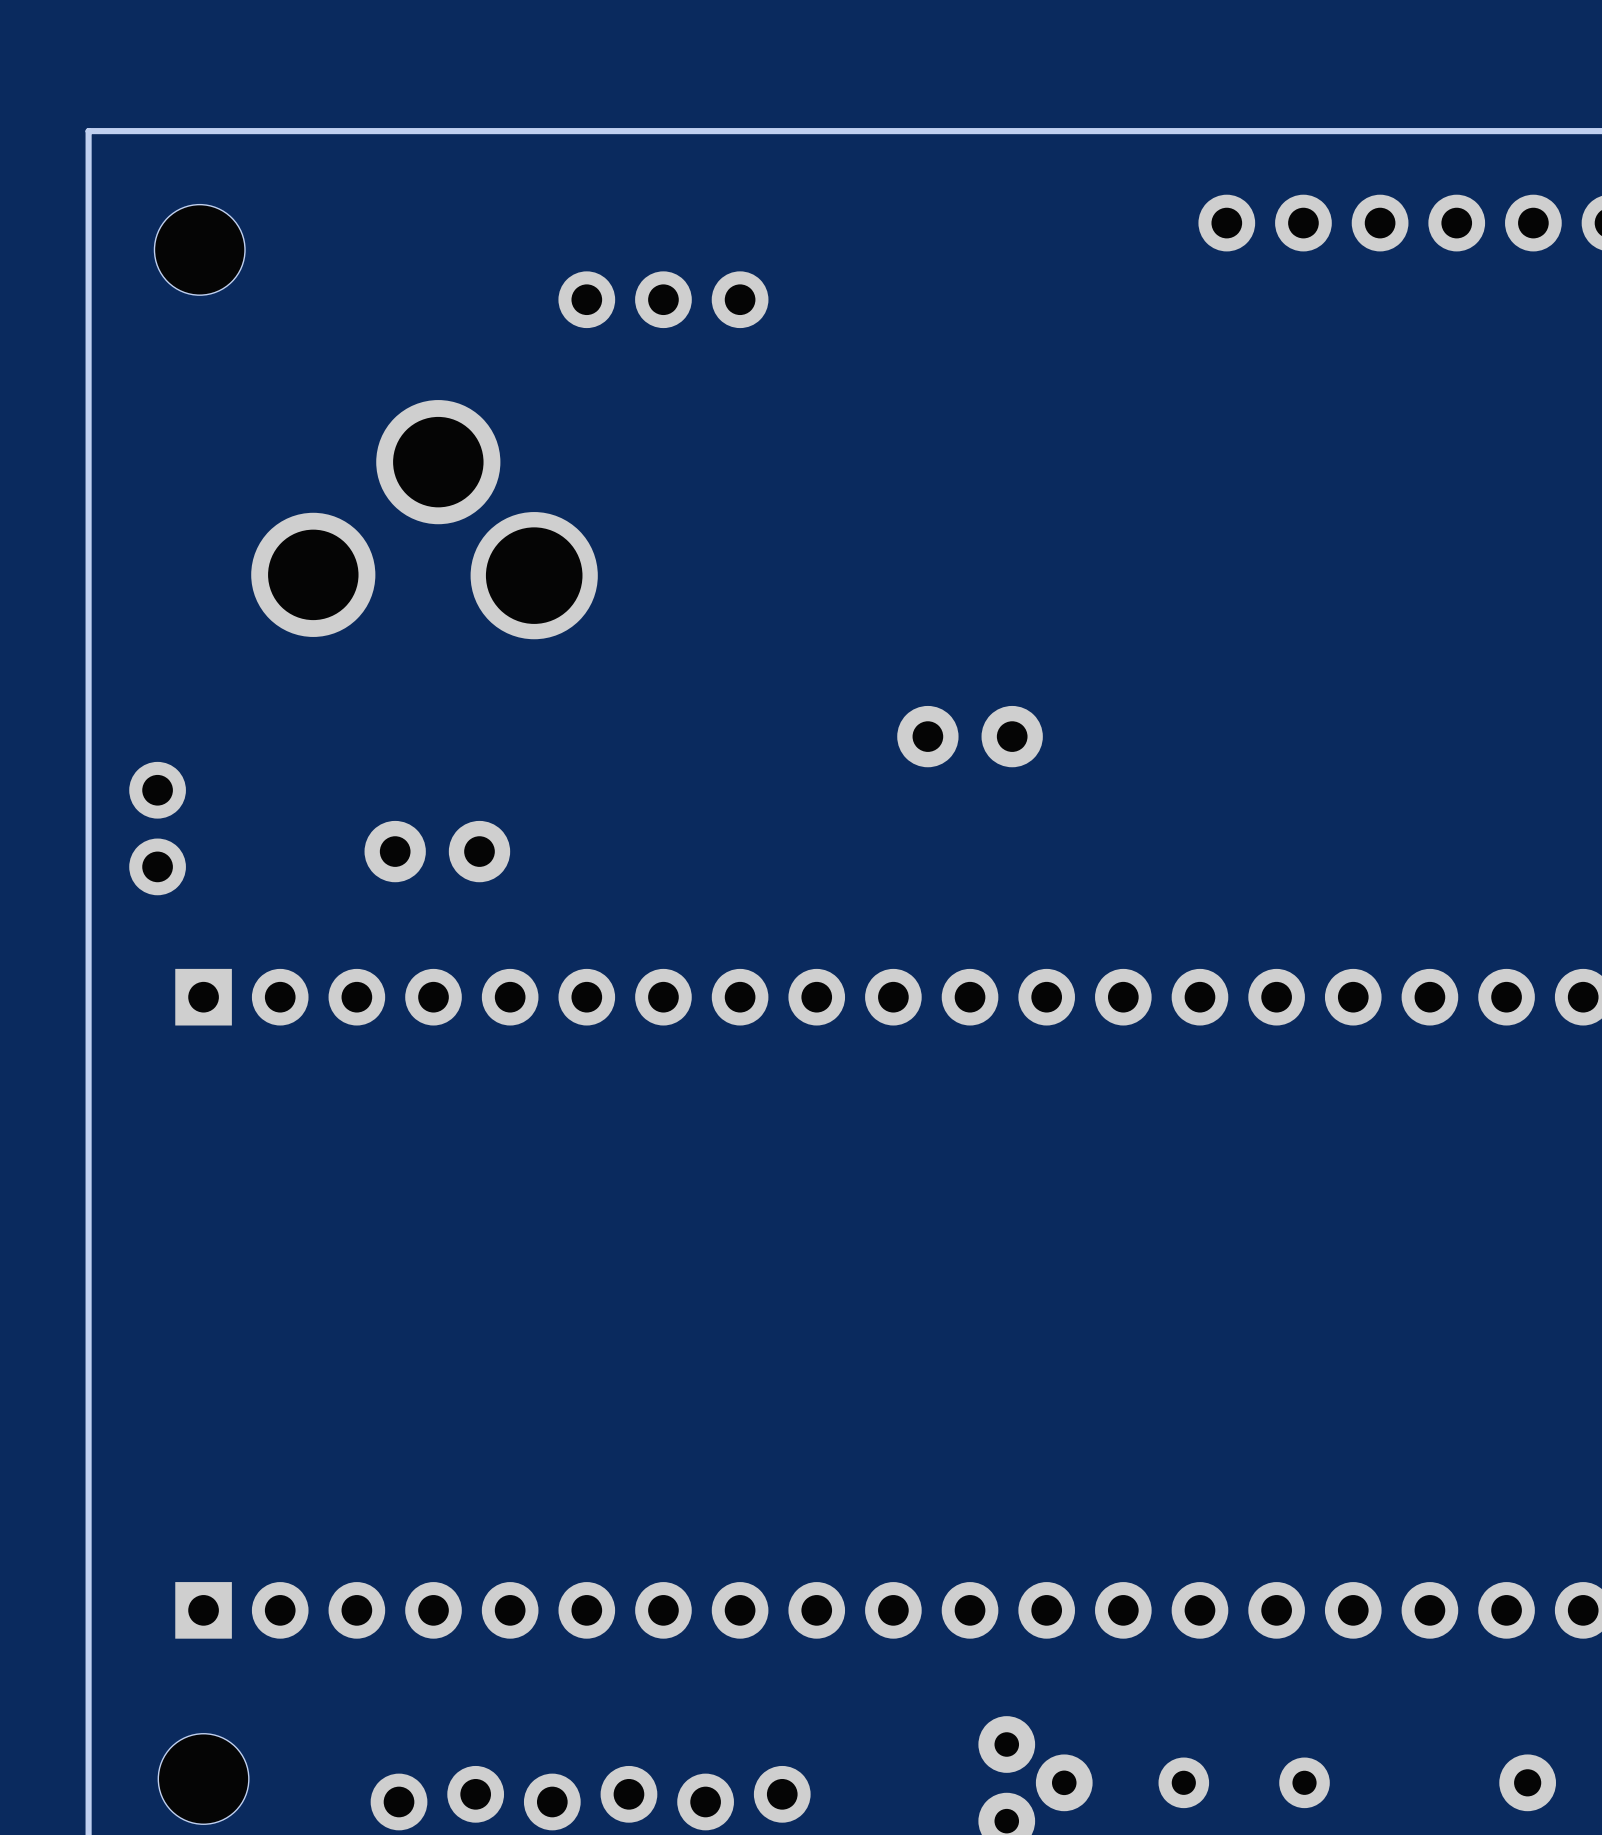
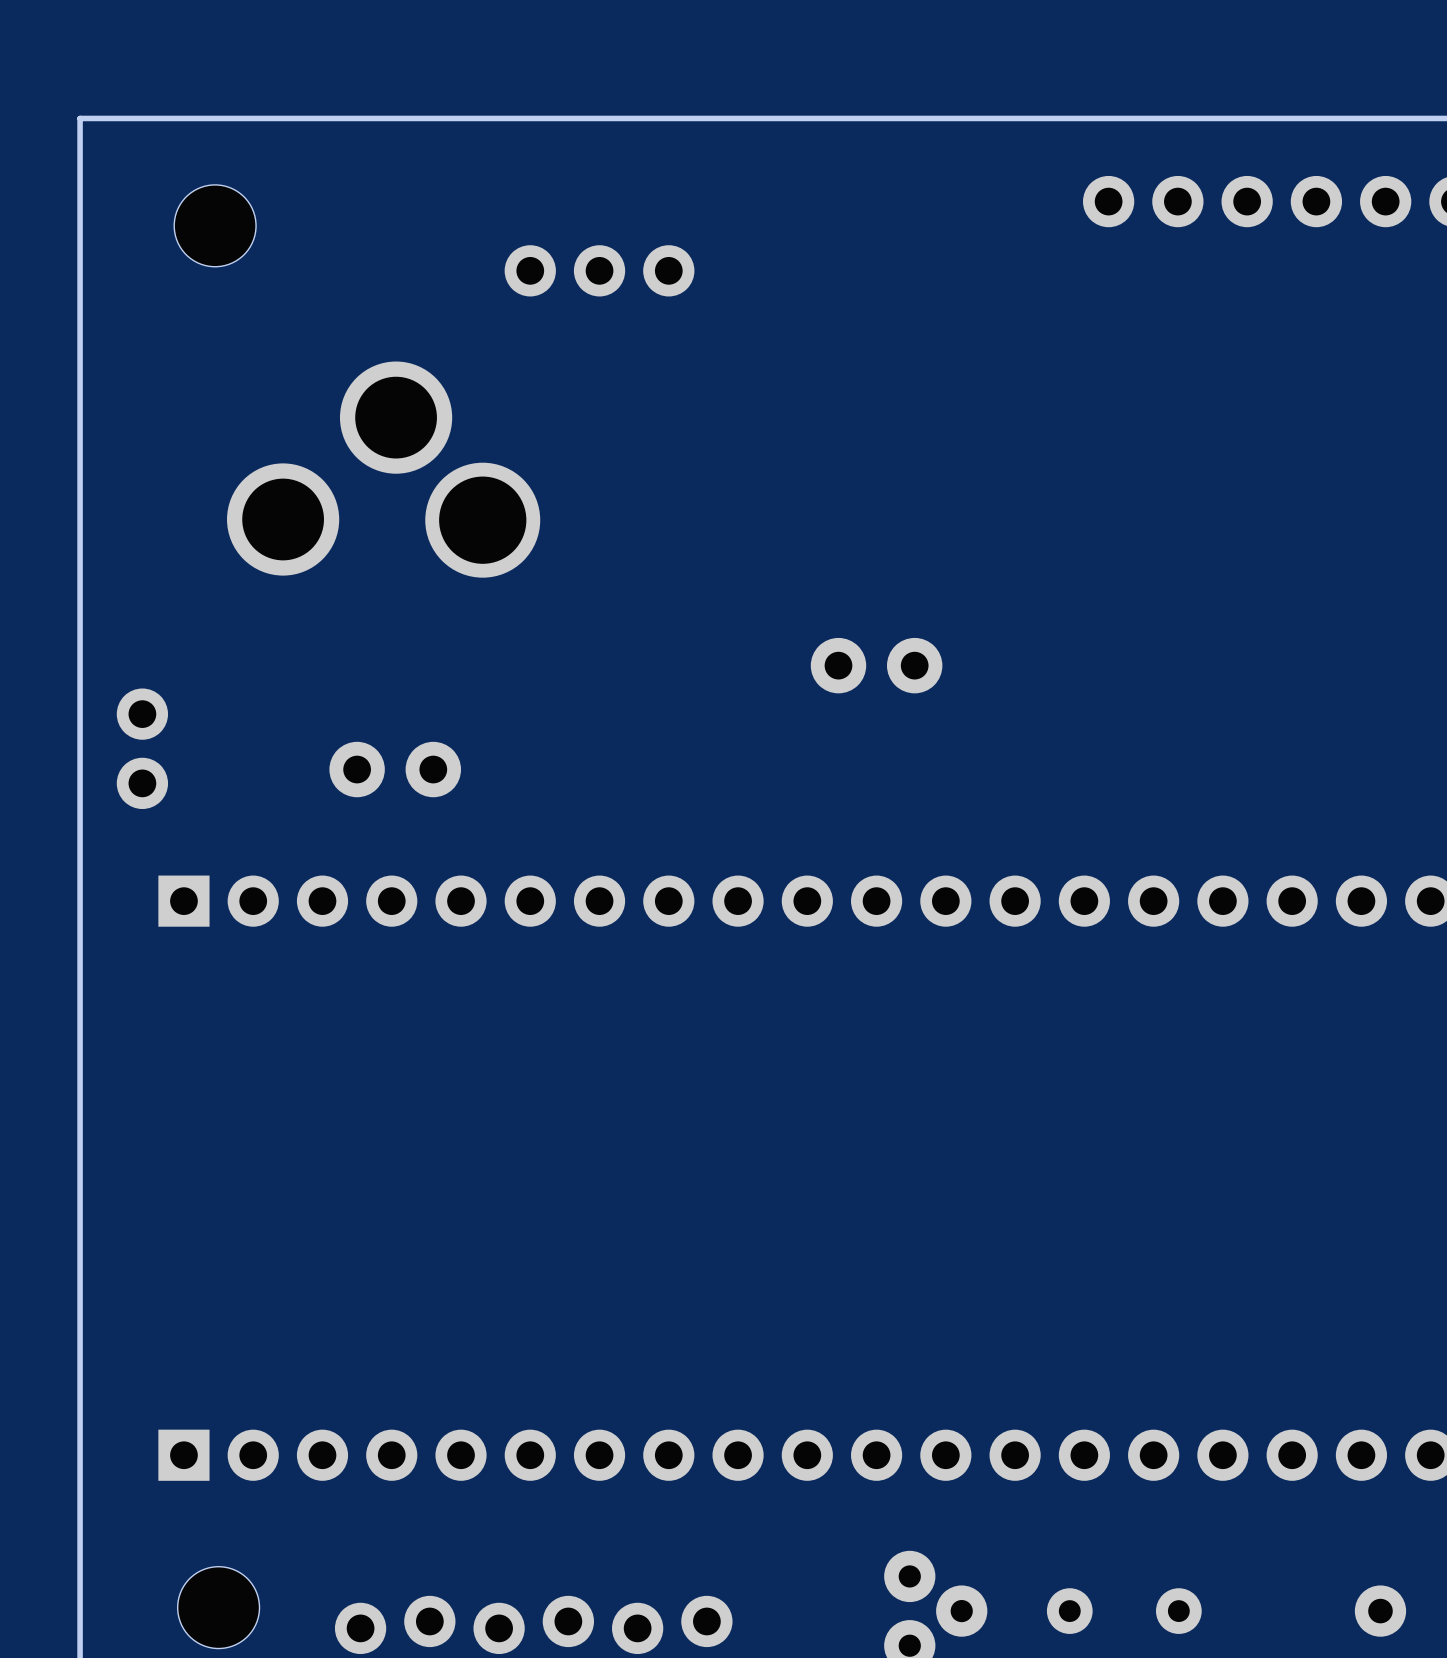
hole position: (199, 249) -> (215, 225)
hole position: (203, 1778) -> (218, 1607)

